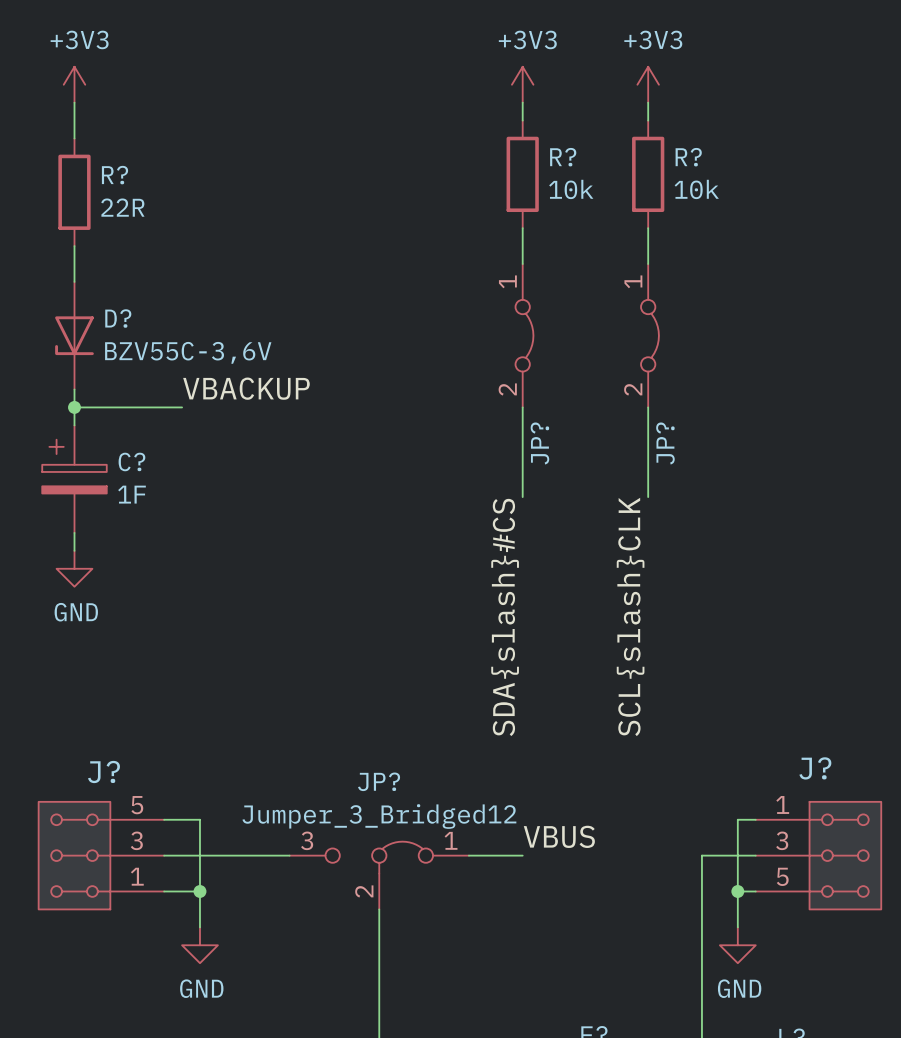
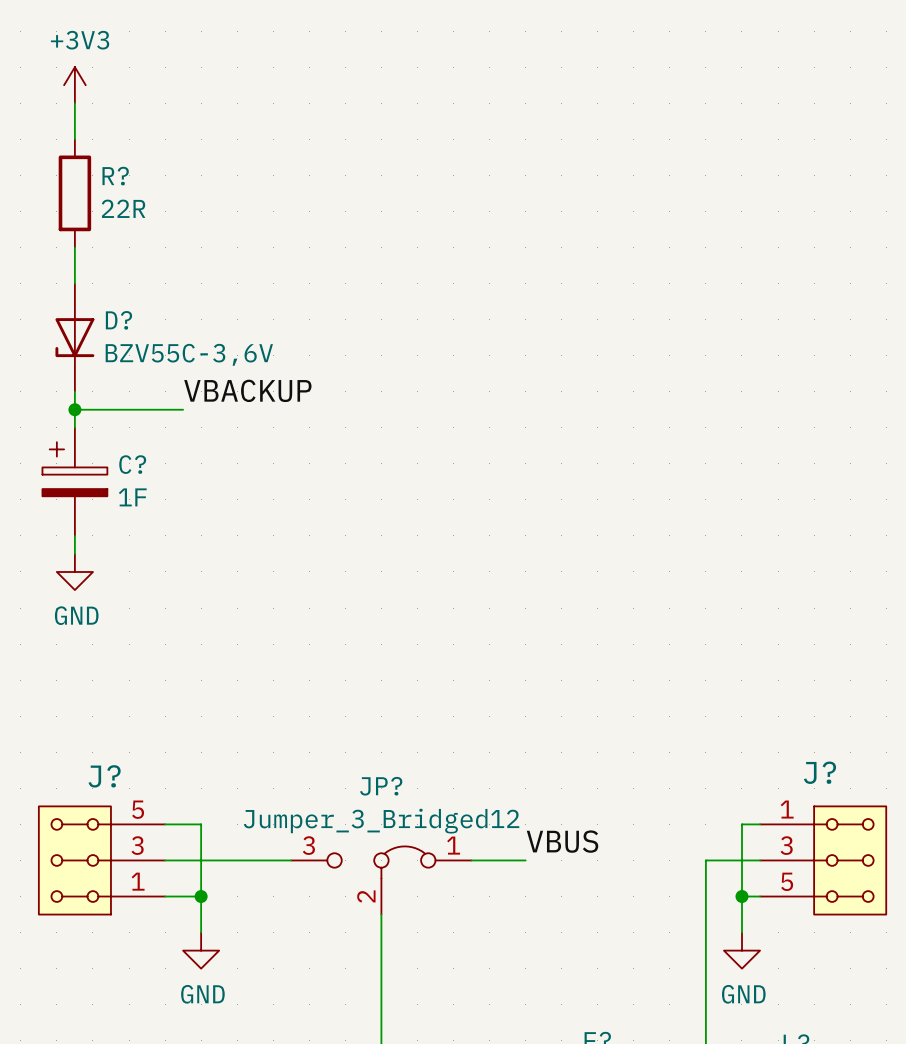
power symbol: +3V3 (522, 84) -> none
power symbol: +3V3 (648, 84) -> none
wire: (522, 102) (522, 120) -> none
wire: (648, 102) (648, 120) -> none
R?: 10k (522, 174) -> none
R?: 10k (648, 174) -> none
wire: (522, 228) (522, 264) -> none
wire: (648, 228) (648, 264) -> none
JP?: (524, 335) -> none
JP?: (649, 335) -> none
wire: (522, 407) (522, 497) -> none
wire: (648, 407) (648, 497) -> none
label: SCL{slash}CLK (630, 616) -> none
label: SDA{slash}#CS (505, 617) -> none

